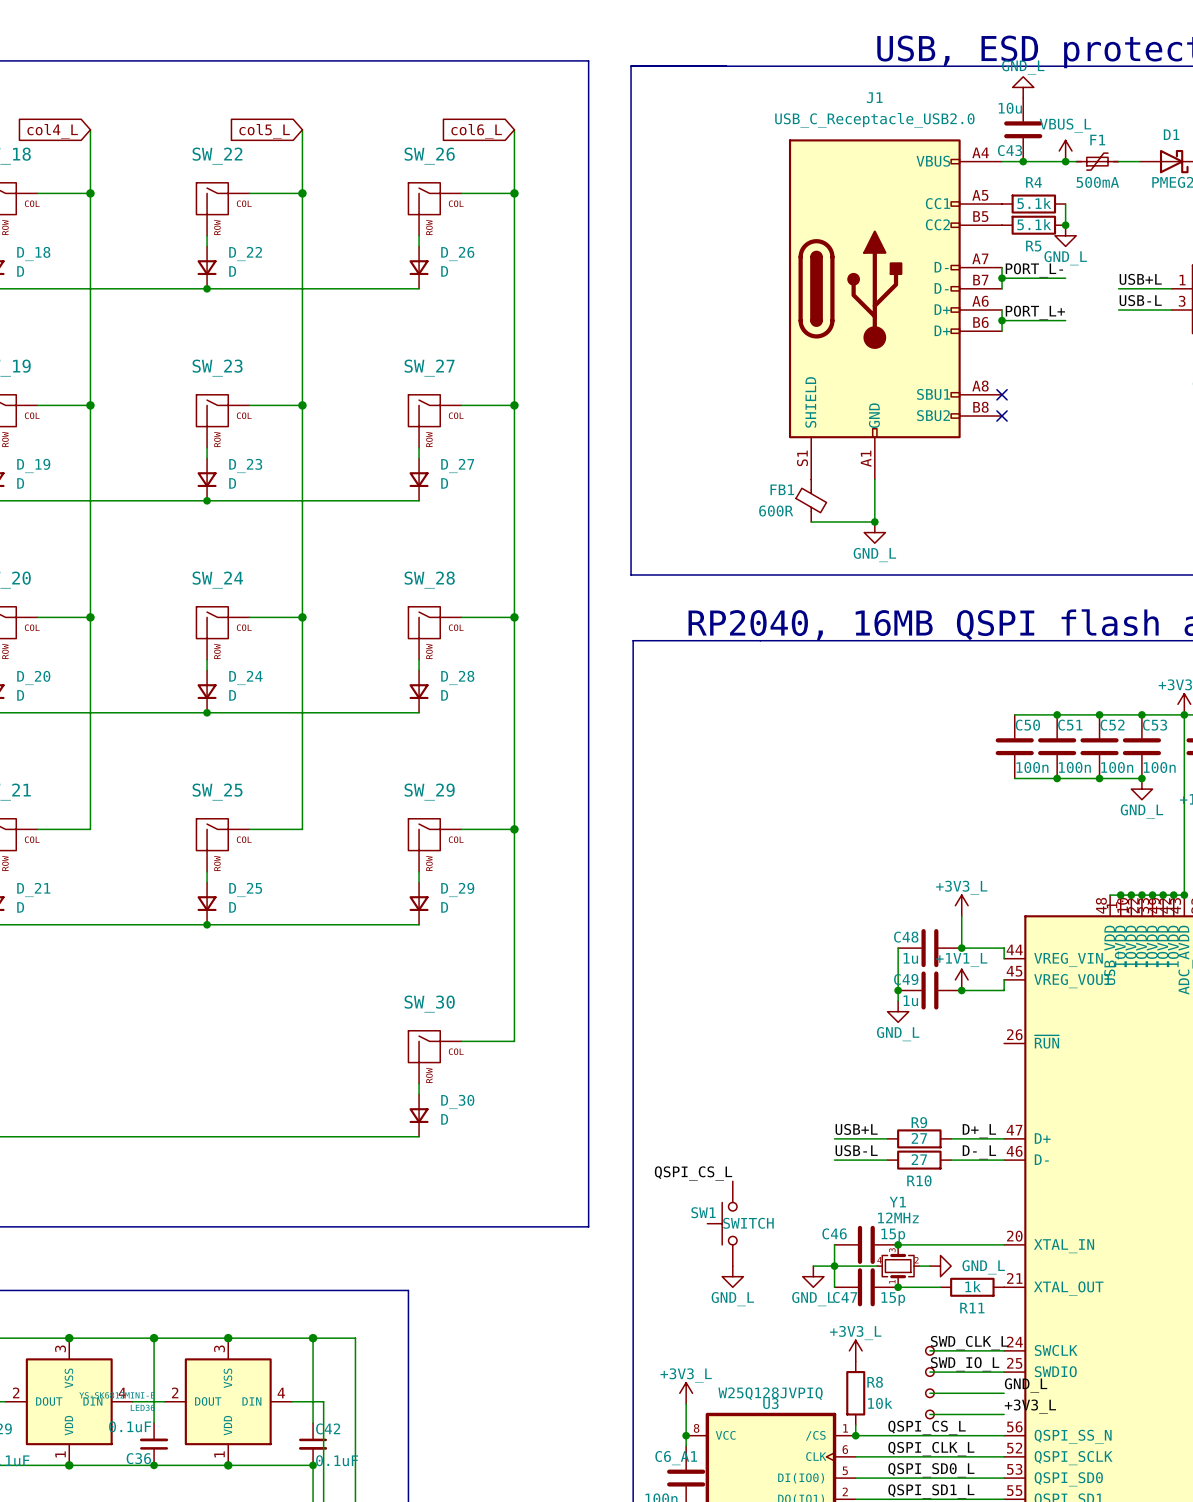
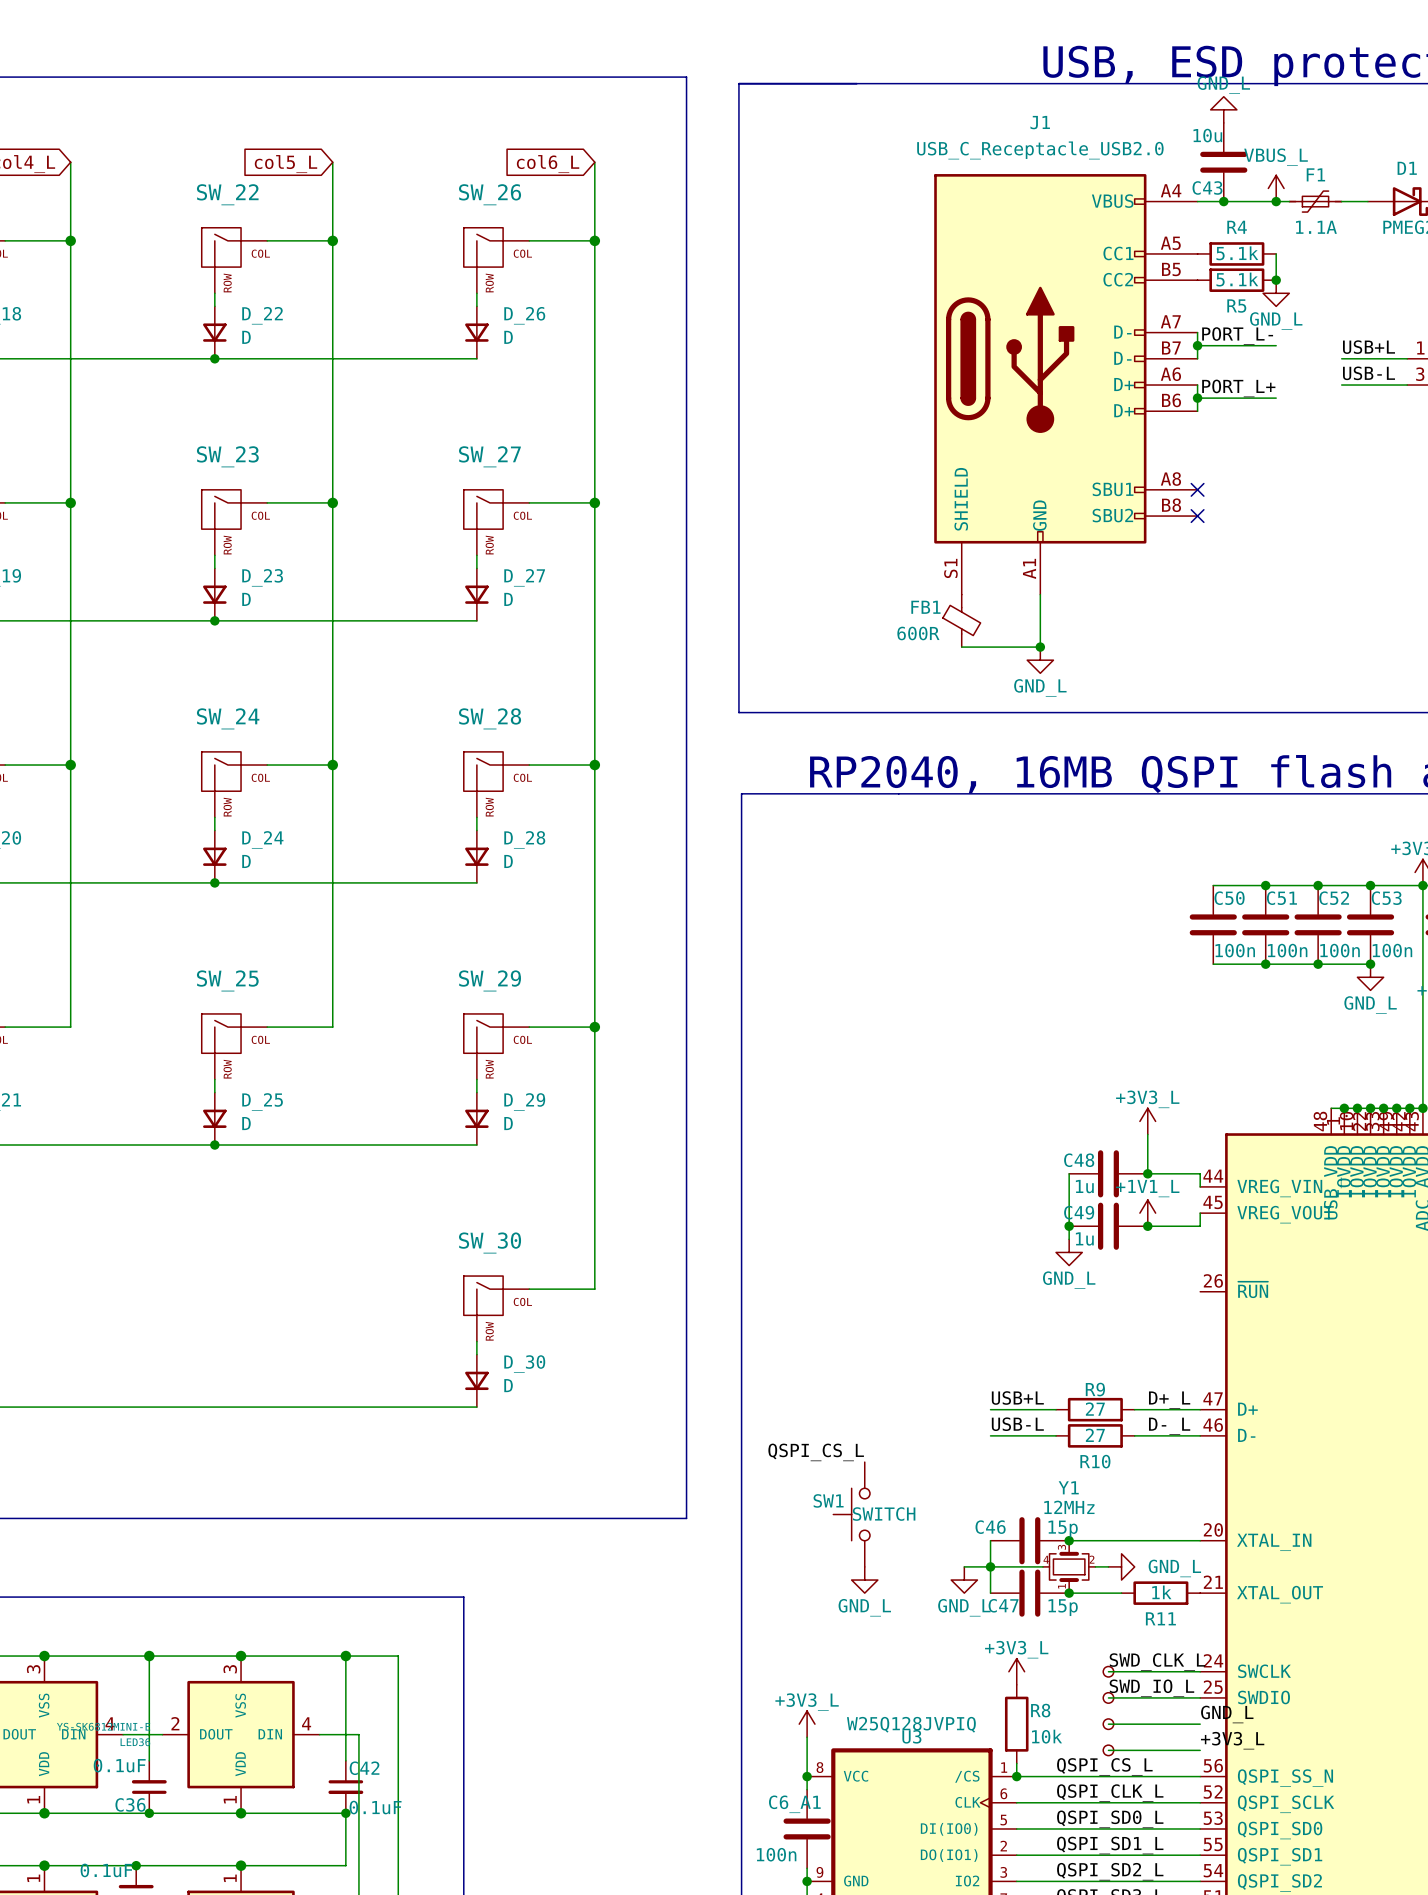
F1 value: 500mA (1097, 182) -> 1.1A (1316, 227)

